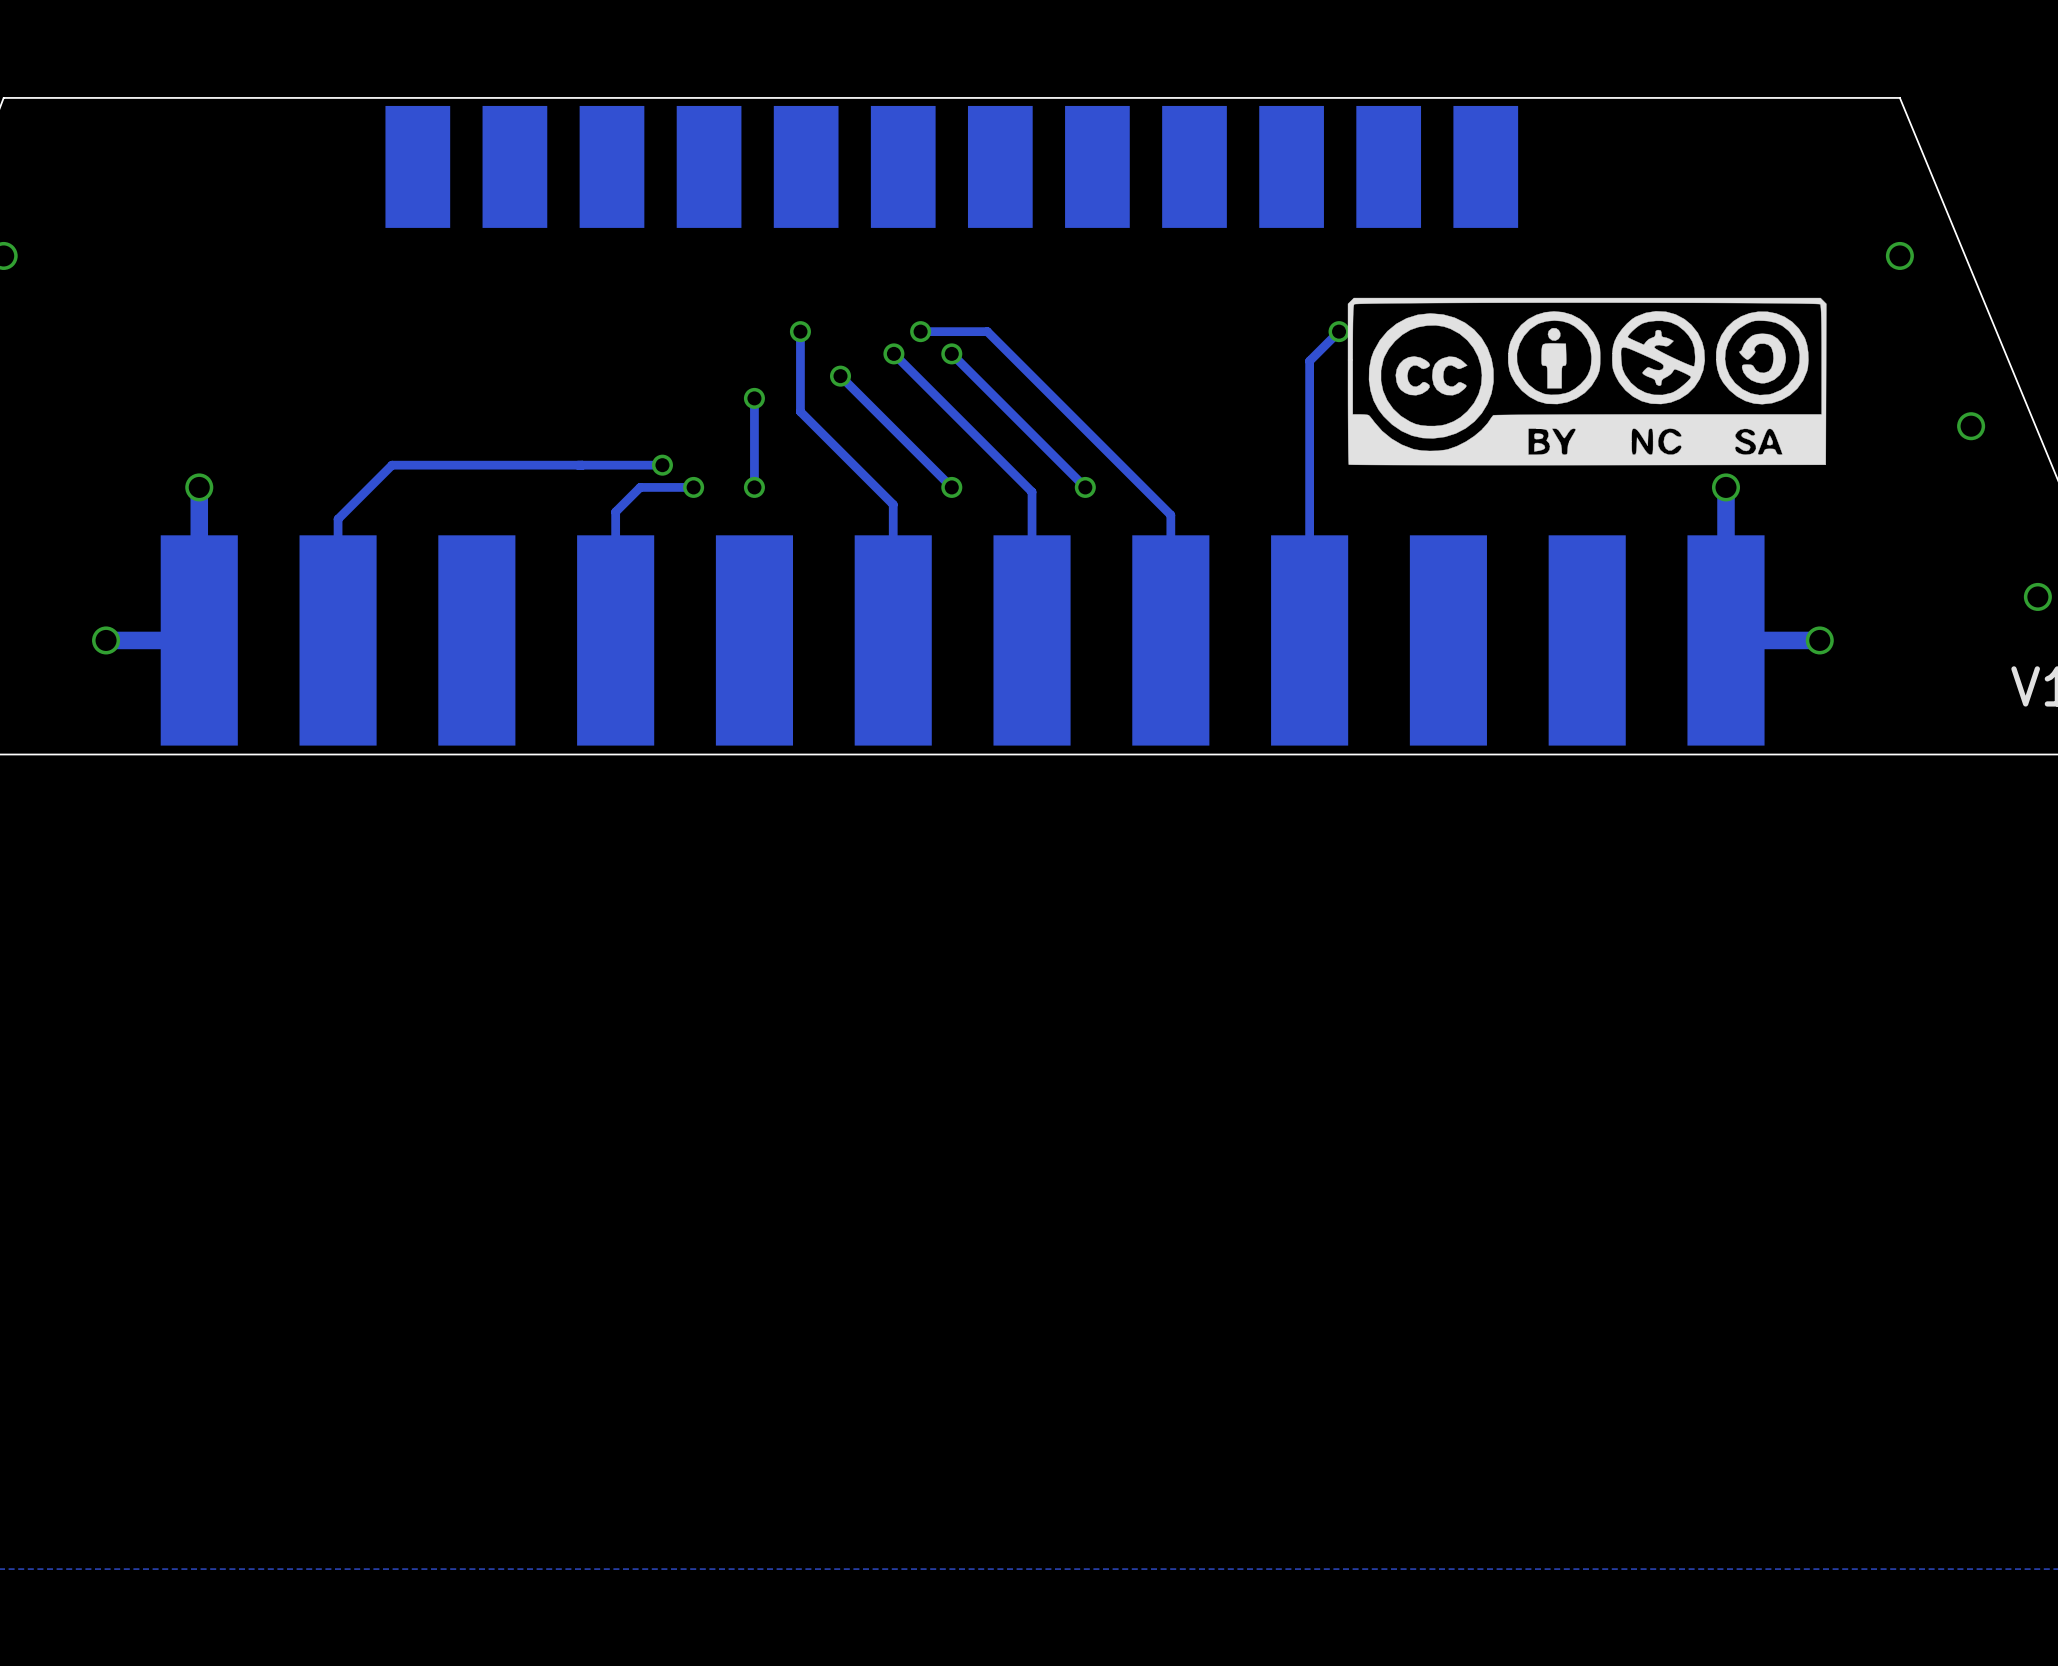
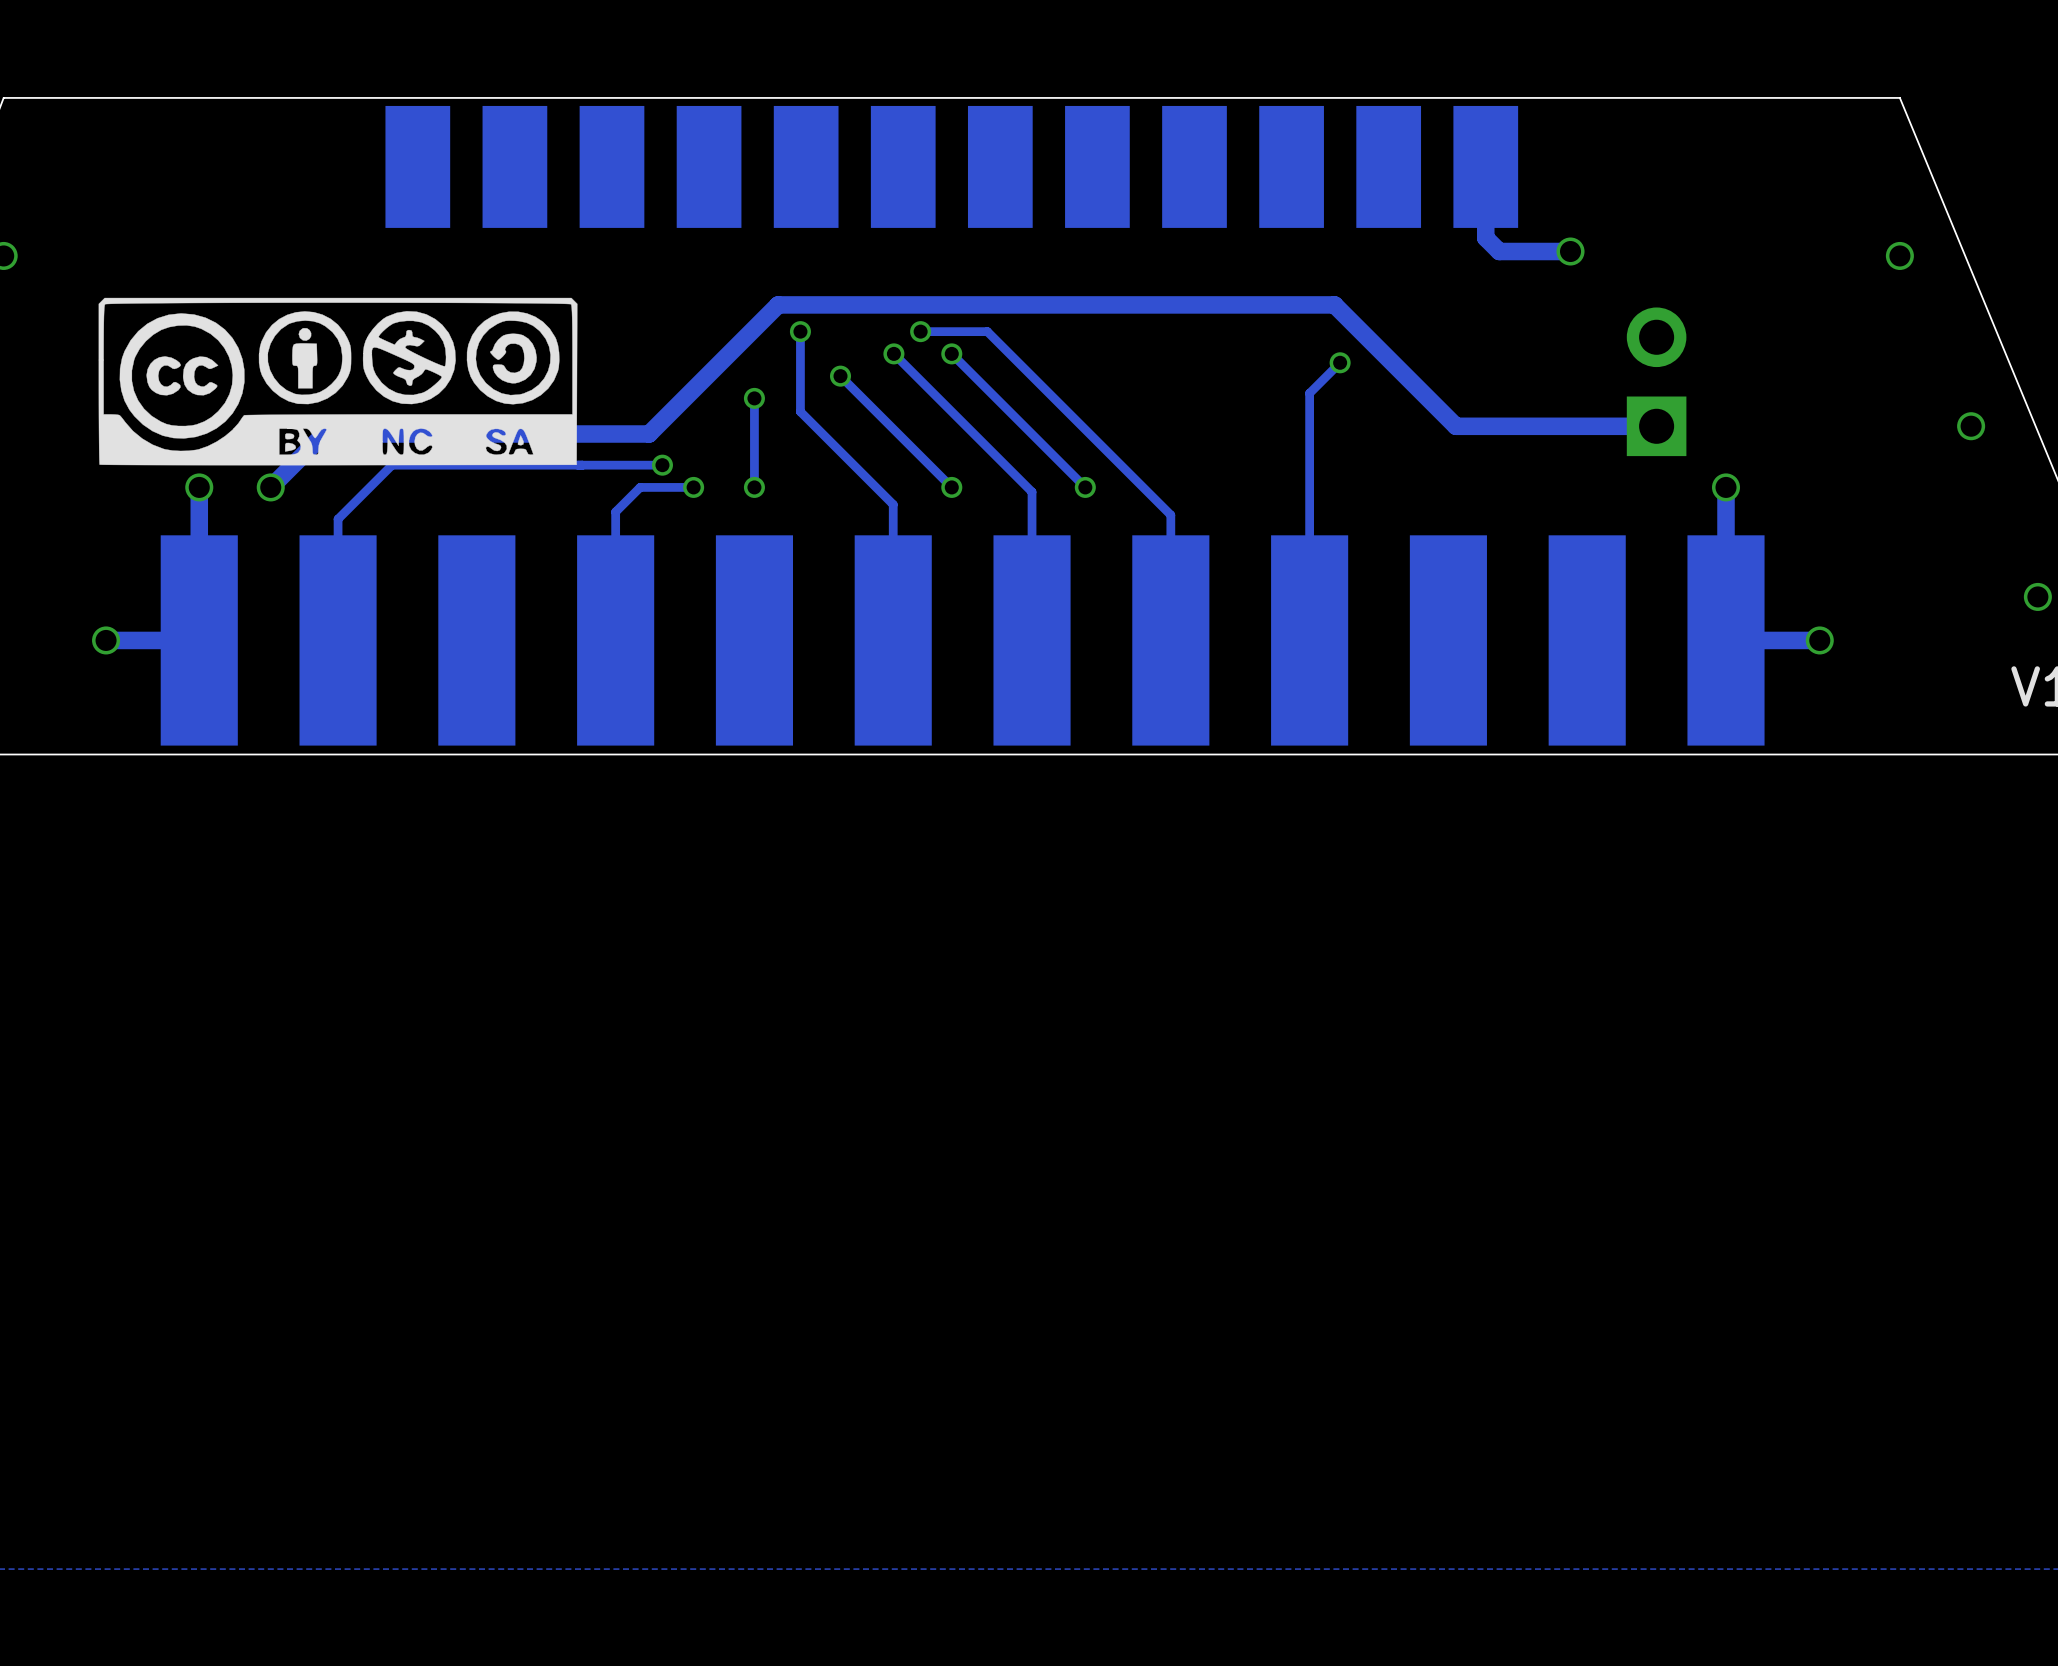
track: none -> (1485, 166) (1485, 237) (1499, 251) (1570, 251)
via: none -> (1570, 251)
drawing: none -> [98, 297, 578, 466]
drawing: [1347, 297, 1827, 466] -> none
track: (1339, 331) (1309, 361) (1309, 393) -> (1340, 362) (1309, 393)
via position: (1339, 331) -> (1340, 362)
part: none -> (1656, 381)
track: none -> (1656, 426) (1455, 426) (1334, 304) (778, 304) (649, 434) (324, 434) (270, 487)
via: none -> (270, 487)

